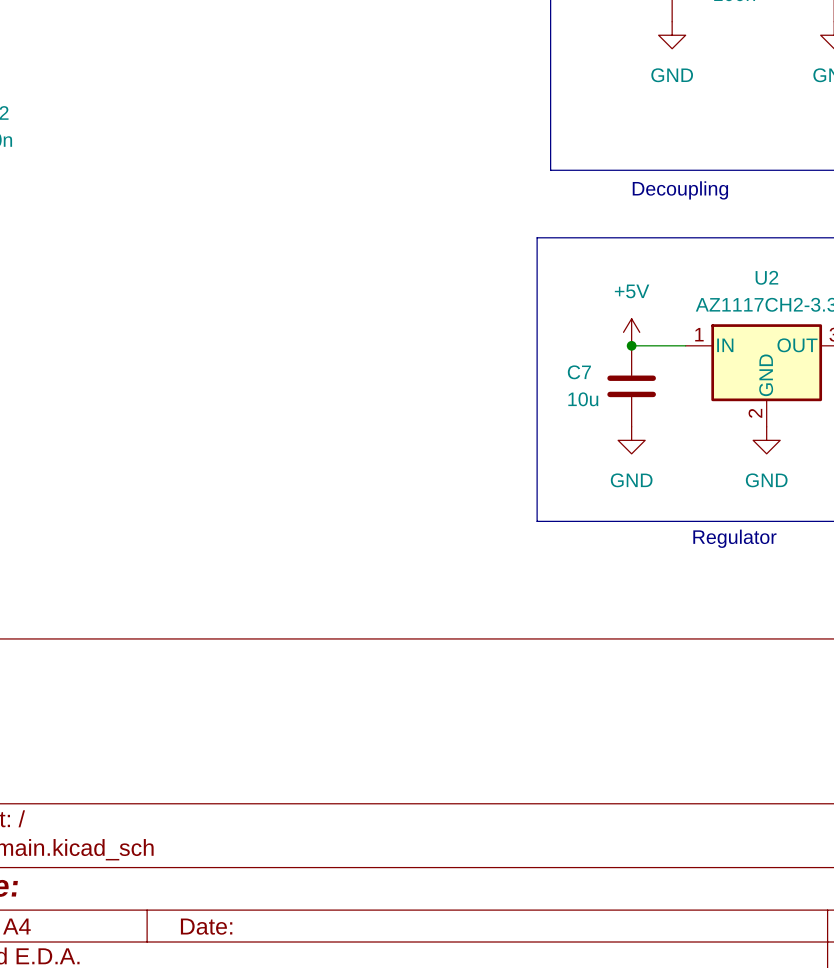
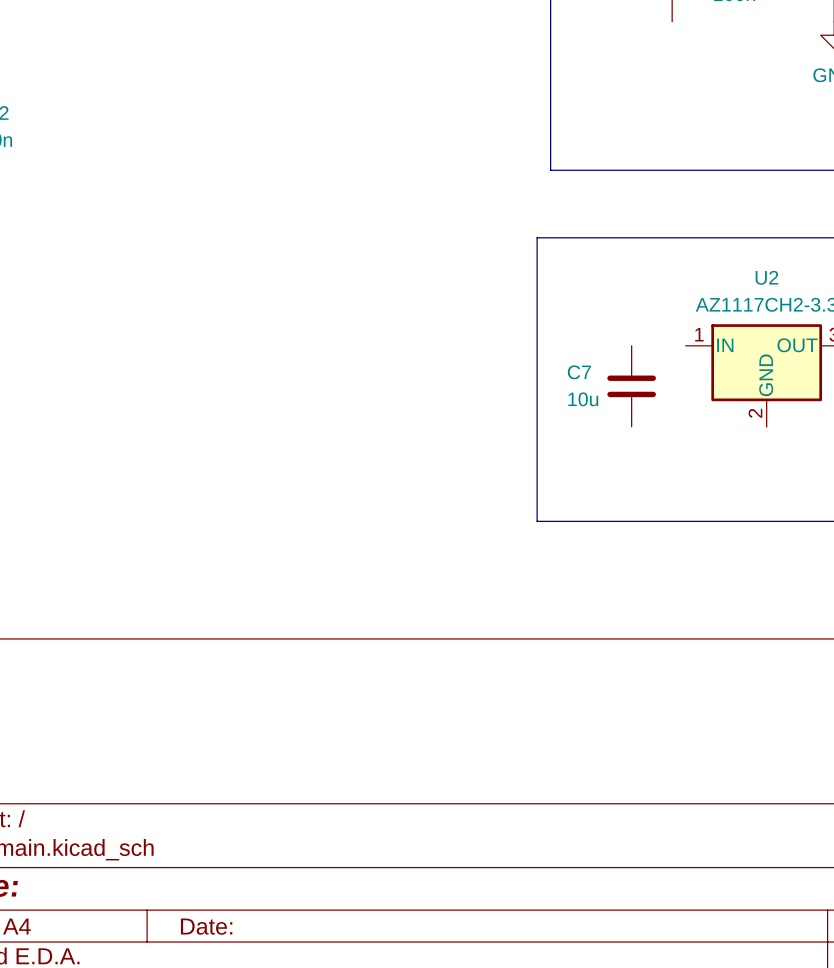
power symbol: GND (672, 35) -> none
text: Decoupling (680, 190) -> none
power symbol: +5V (631, 332) -> none
wire: (631, 345) (685, 345) -> none
junction: (631, 345) -> none
power symbol: GND (631, 440) -> none
power symbol: GND (766, 440) -> none
text: Regulator (734, 538) -> none

